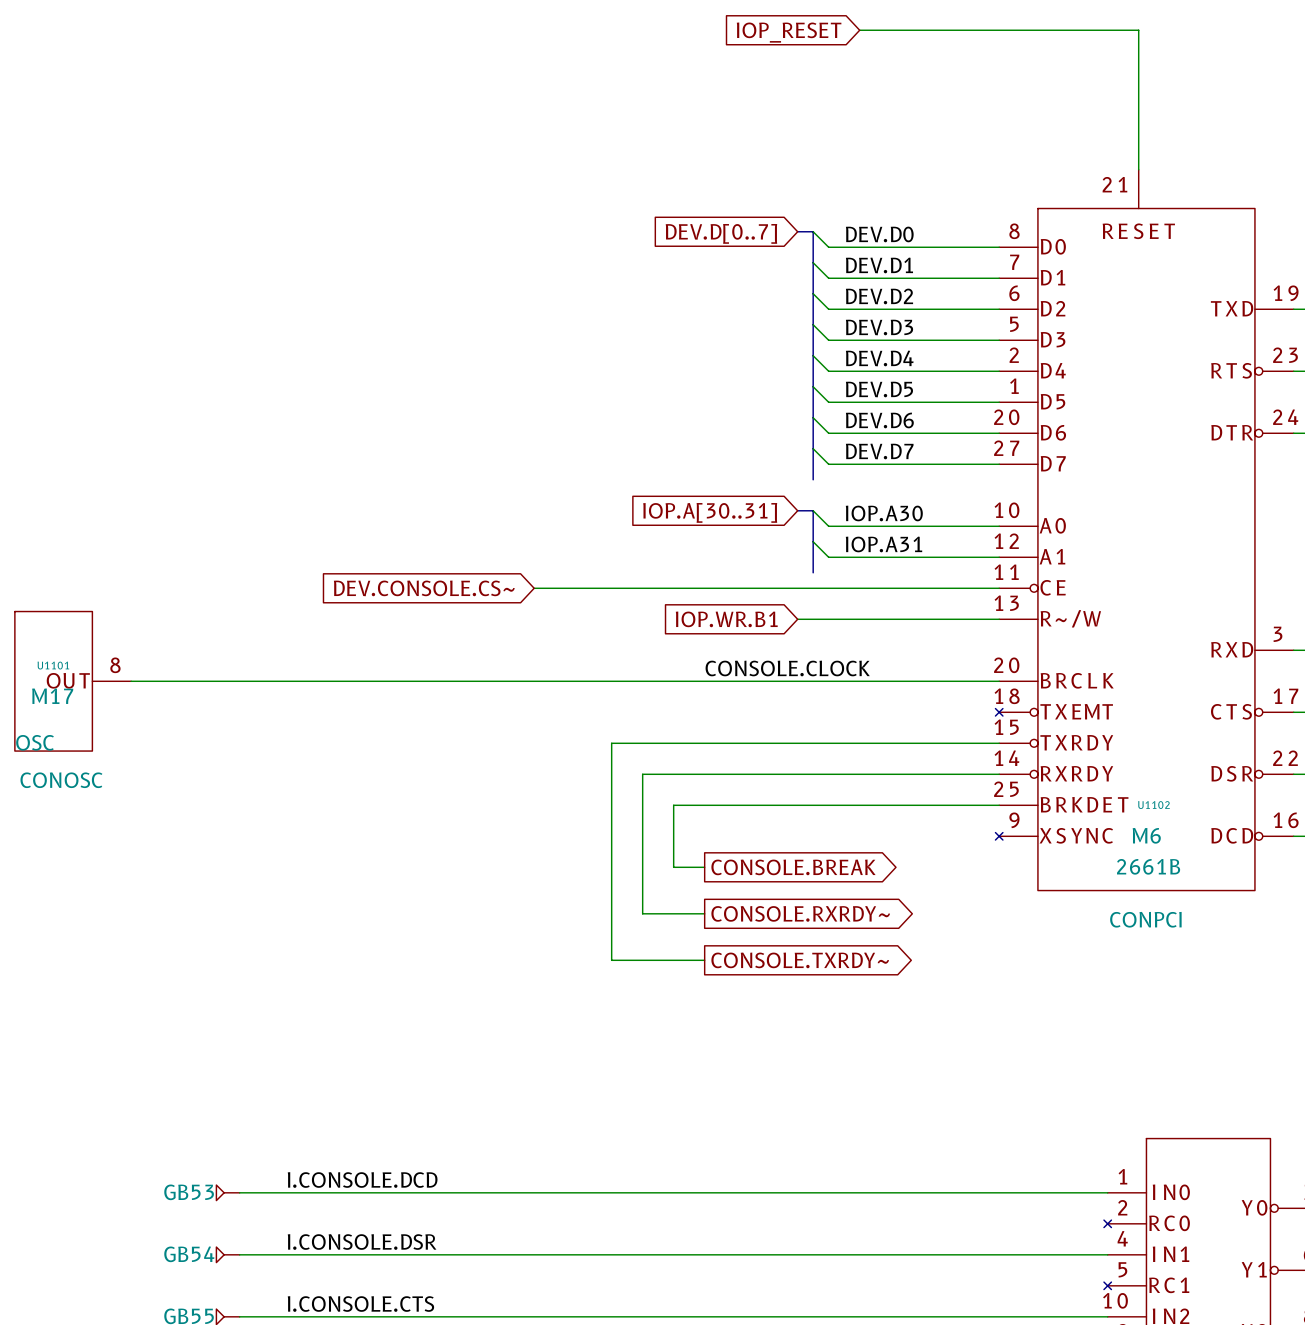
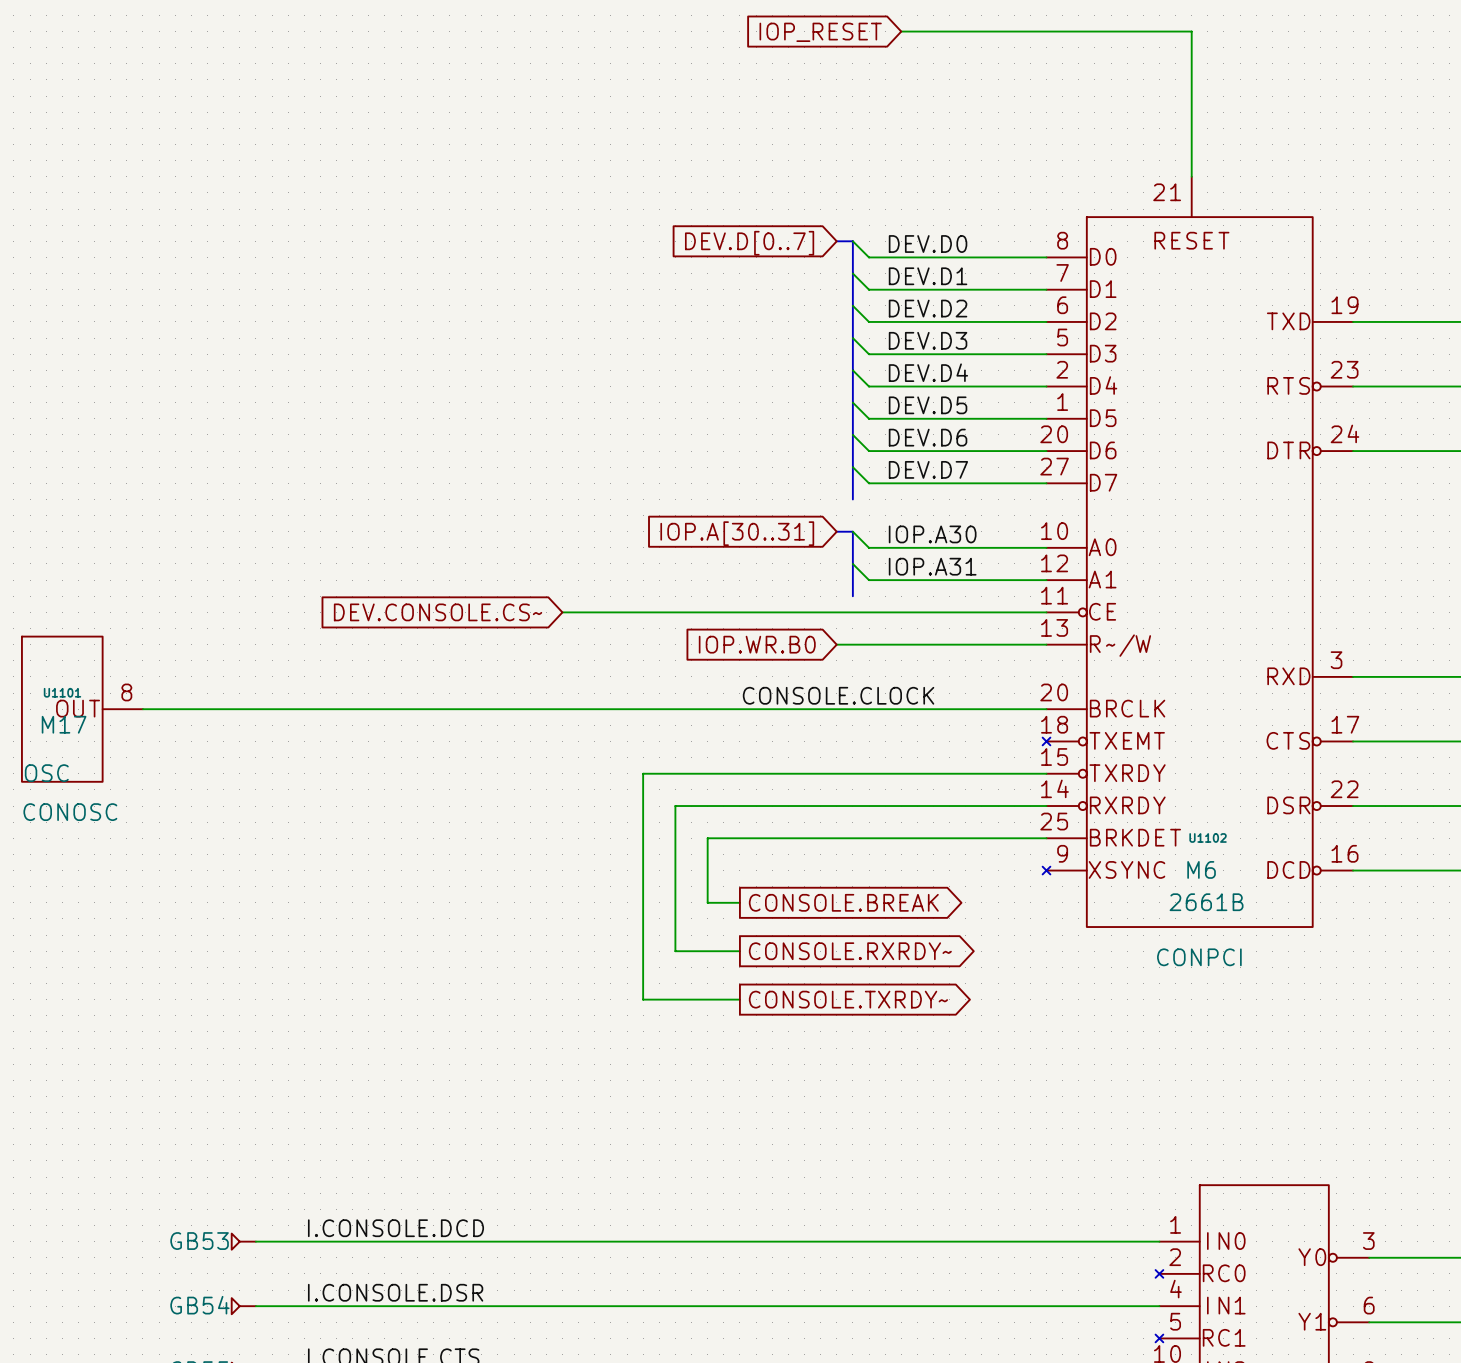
global label: IOP.WR.B1 (726, 619) -> IOP.WR.B0 (757, 644)

